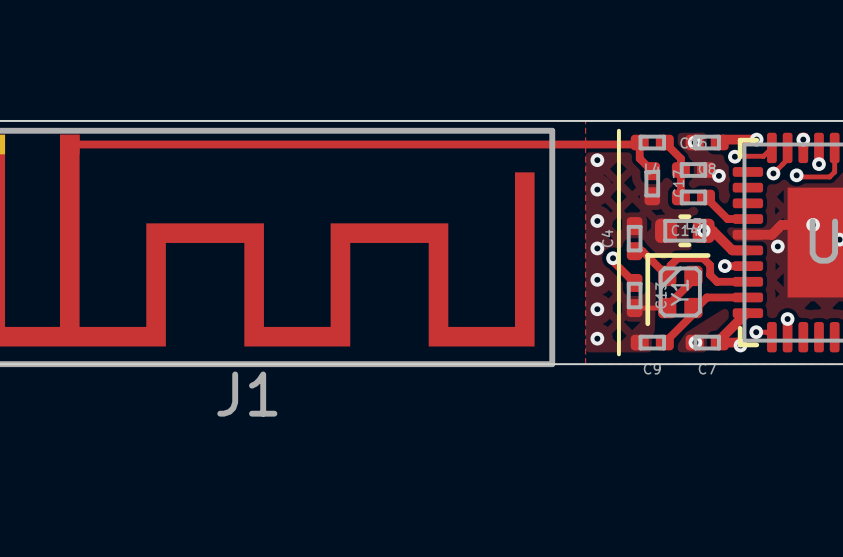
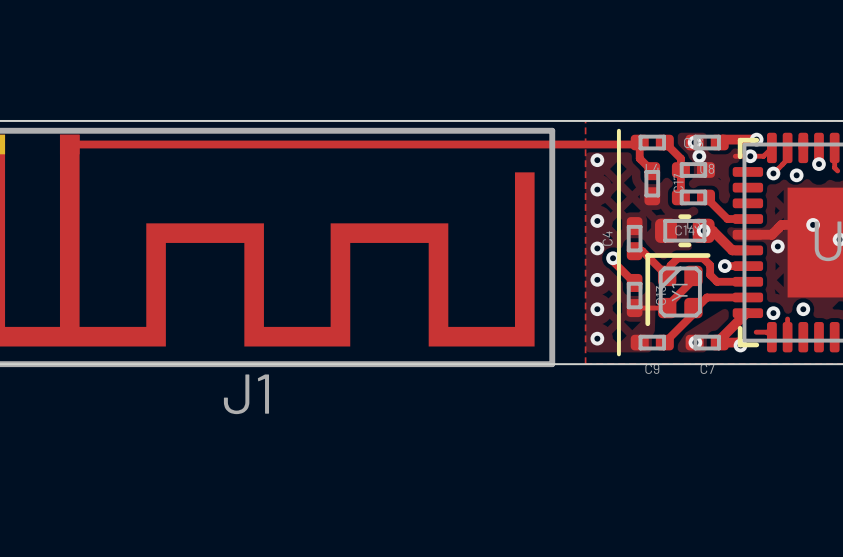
via: (803, 139) -> none
via: none -> (699, 156)
via position: (734, 156) -> (750, 156)
track: (834, 167) (834, 171) (829, 176) (798, 176) (796, 175) -> (834, 167) (837, 170)
via: (718, 175) -> none
via: none -> (803, 309)
via: none -> (773, 313)
via: (787, 319) -> none
via: (756, 332) -> none

